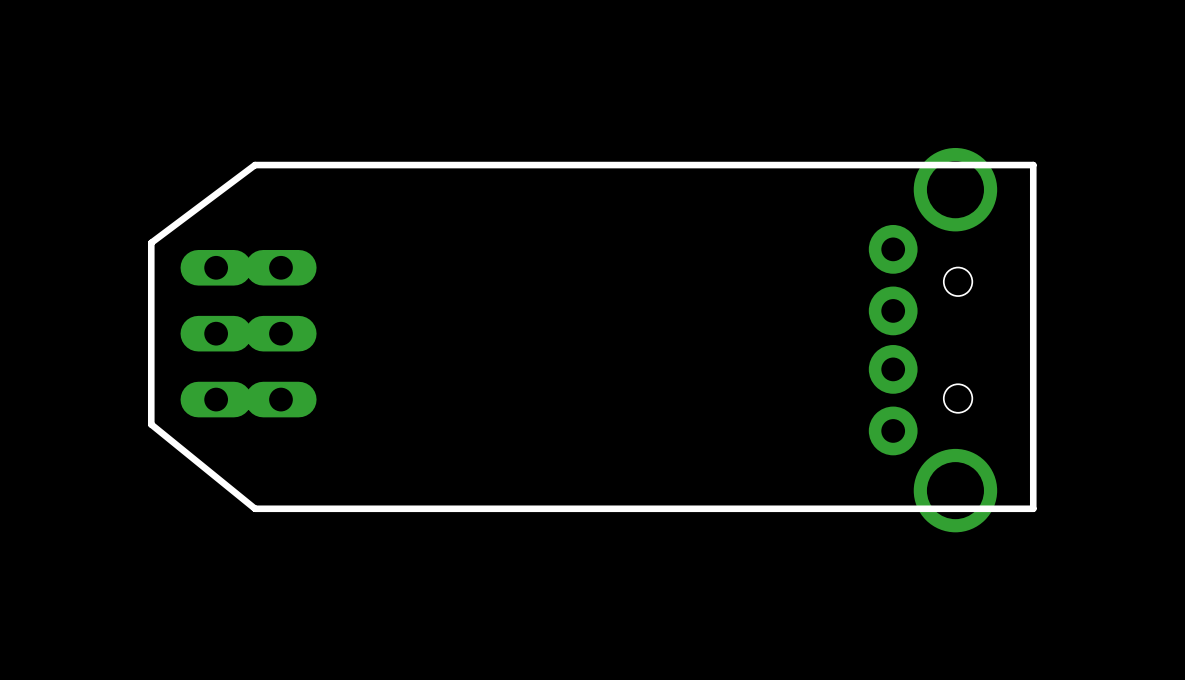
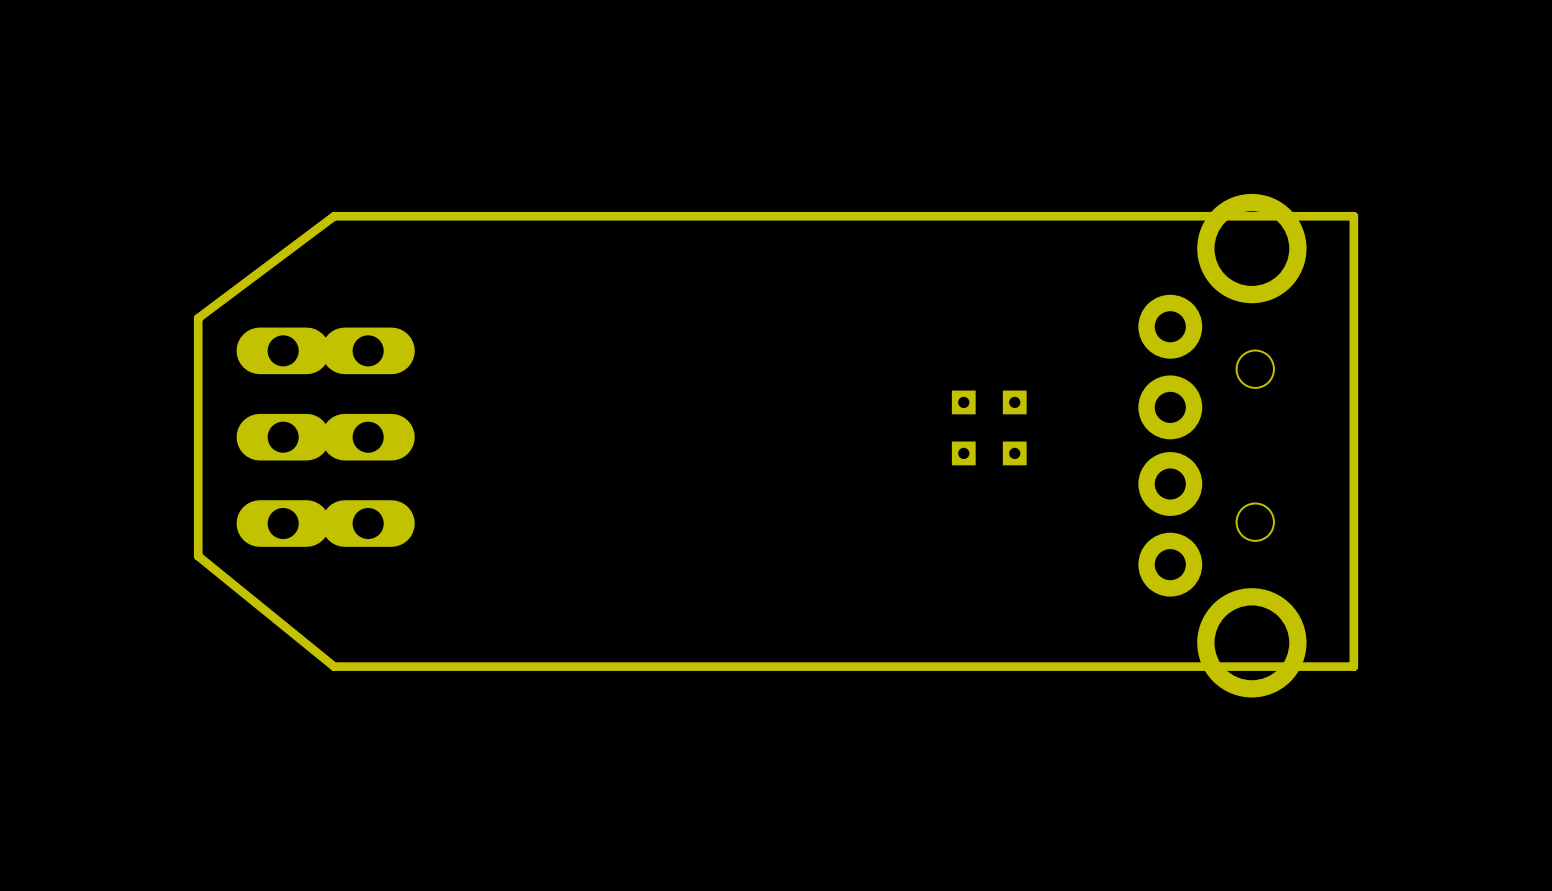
part: none -> (989, 427)

